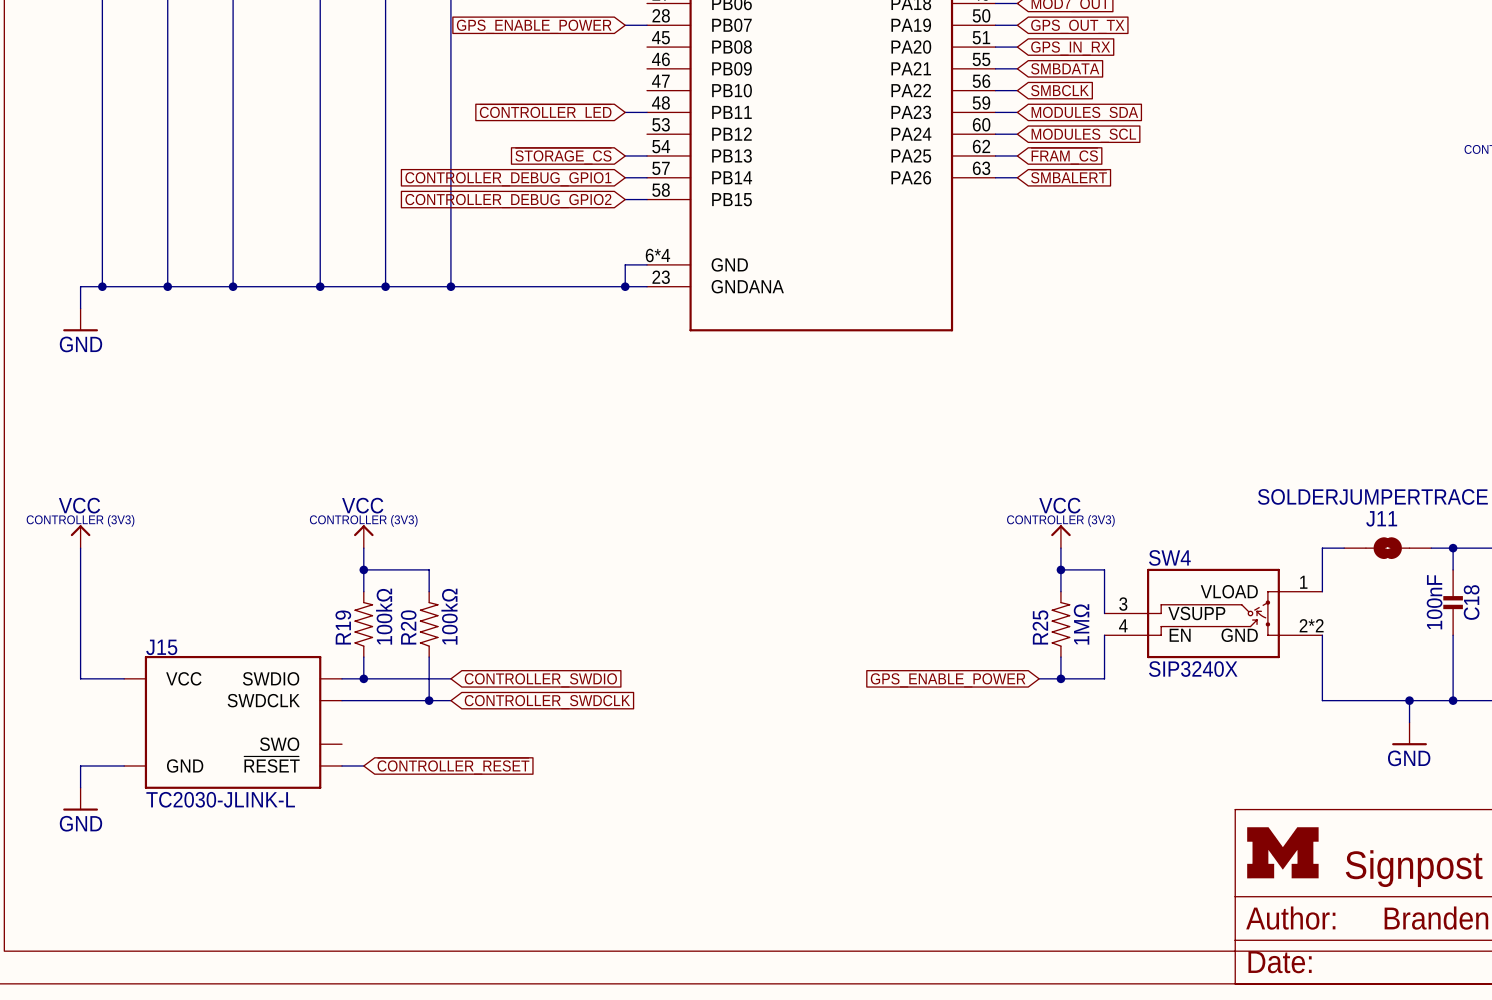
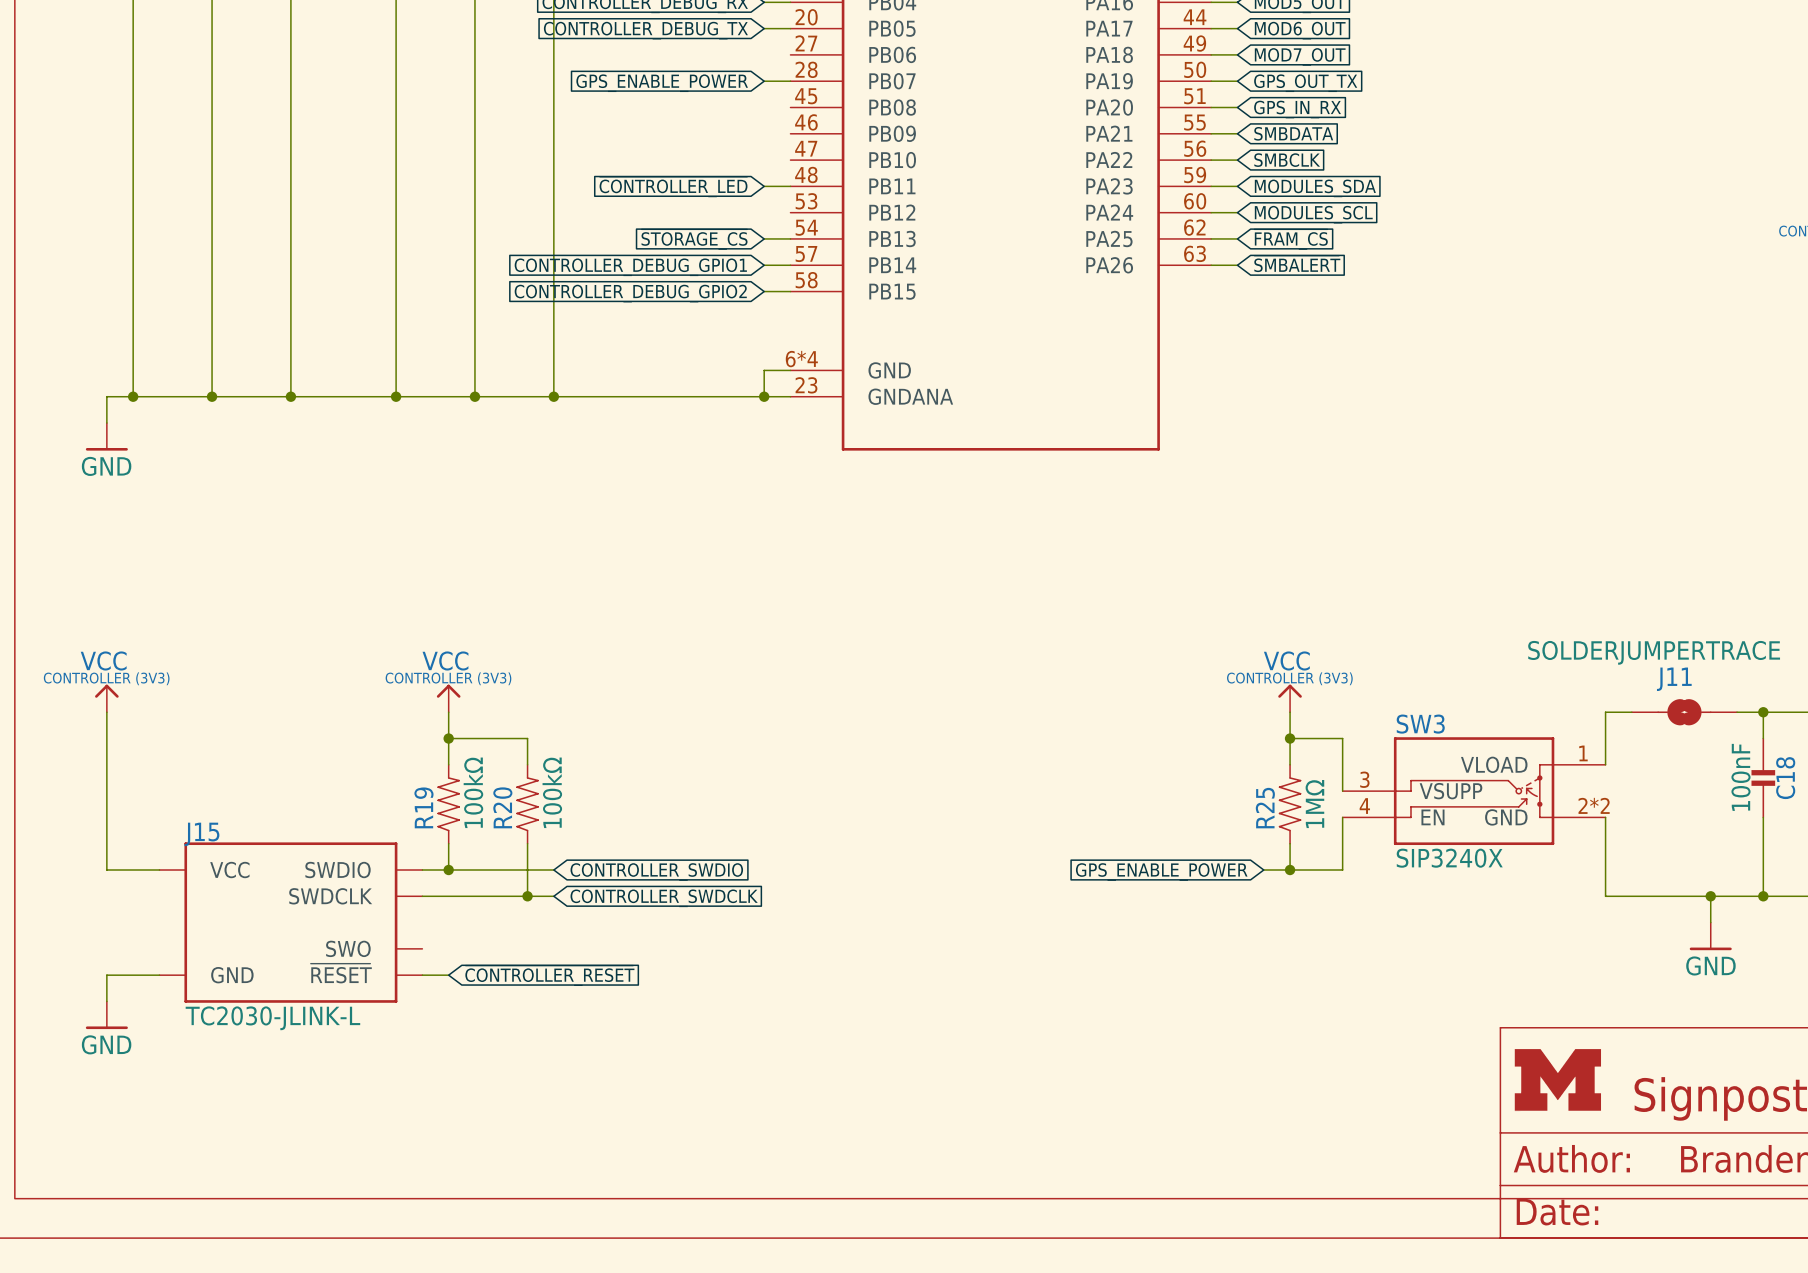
SW4 name: SW4 (1169, 557) -> SW3 (1420, 724)

